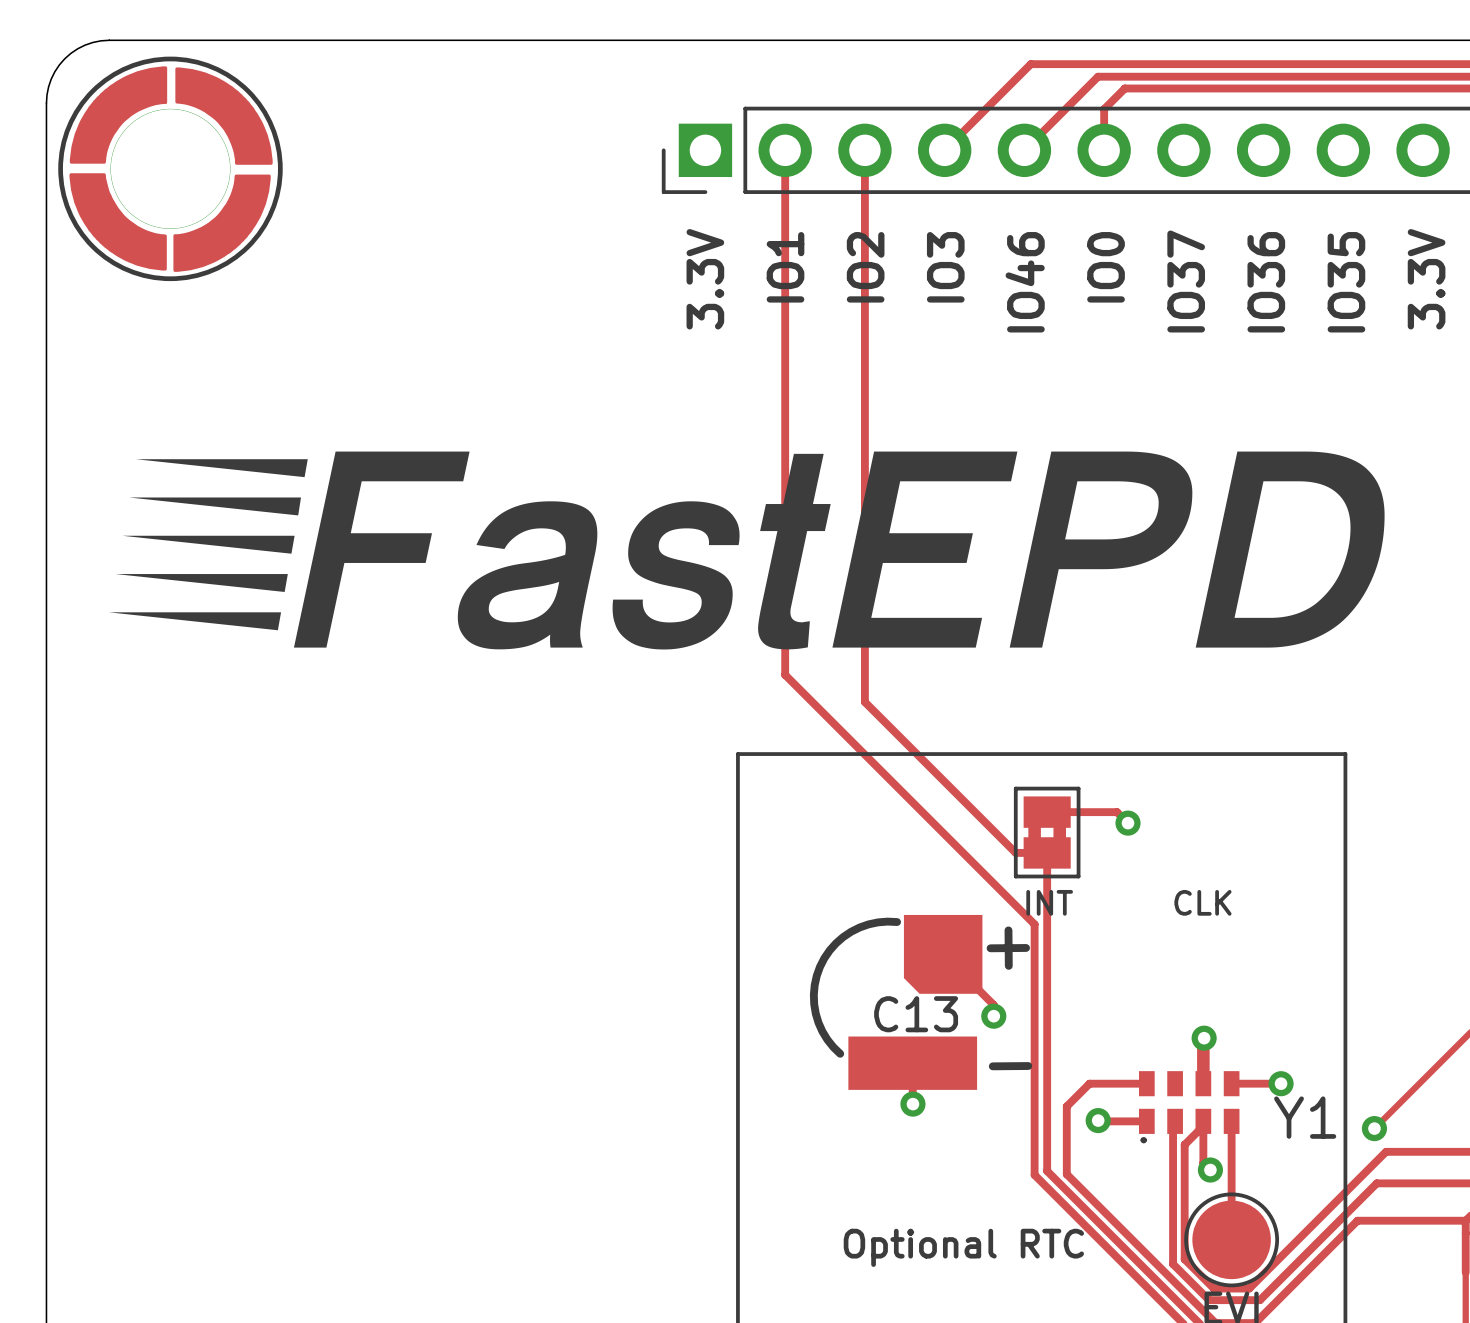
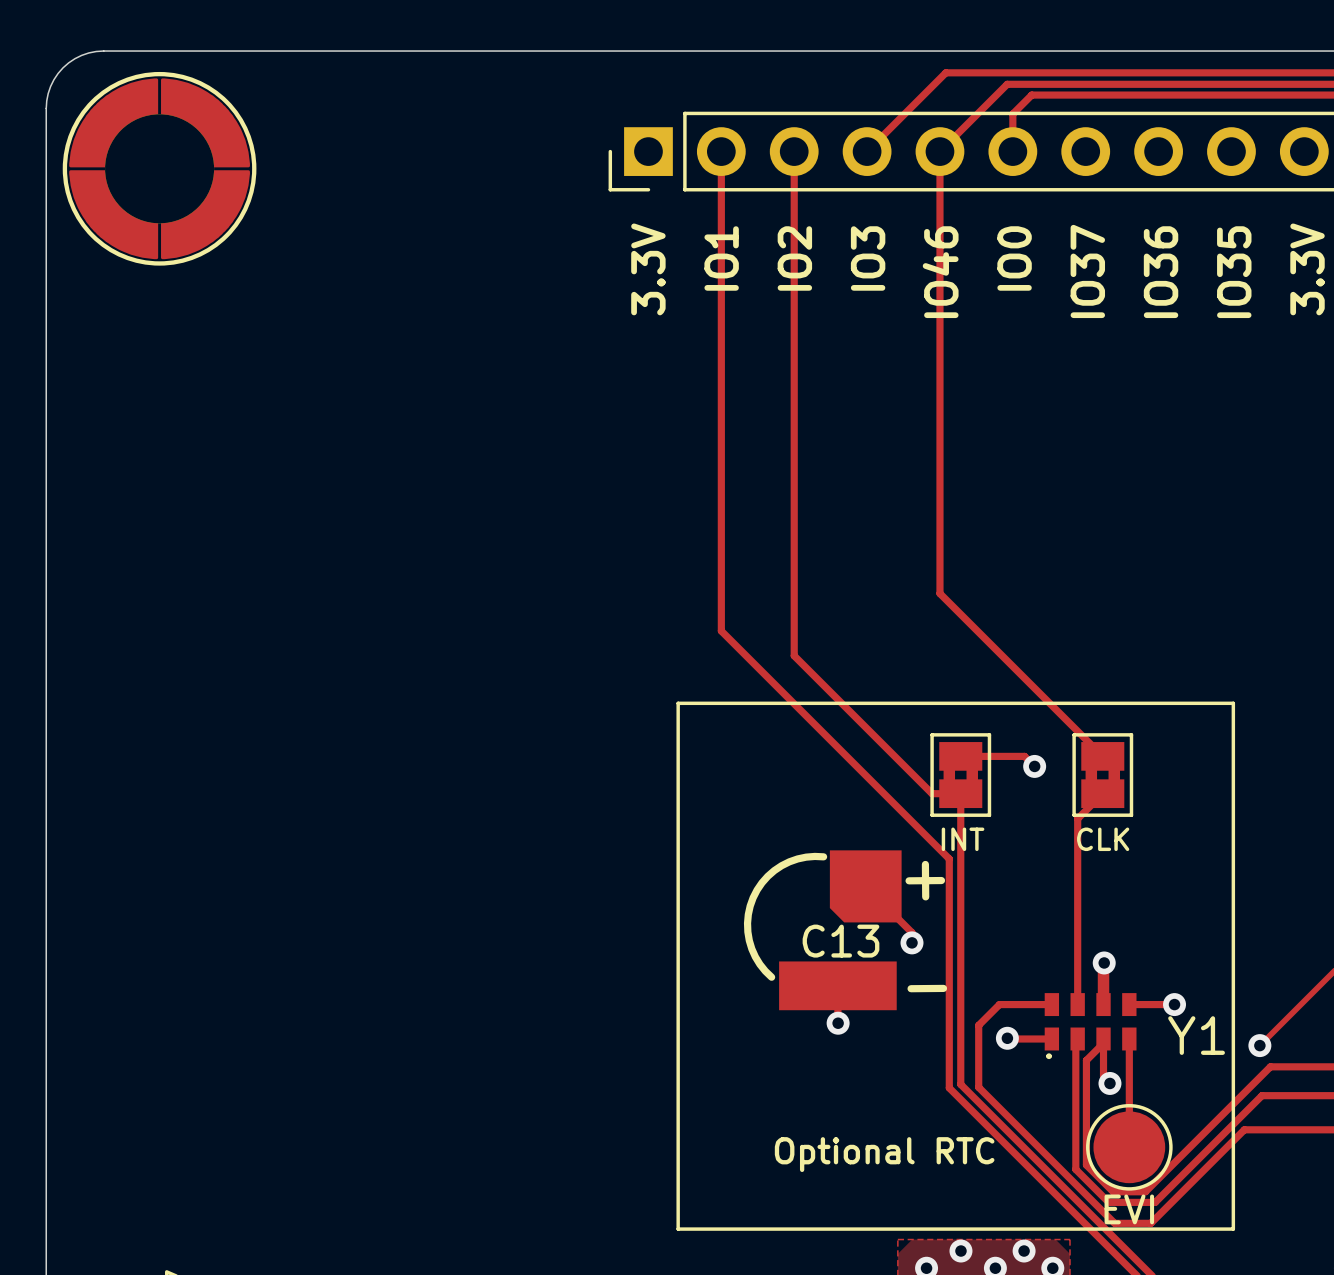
part footprint: [58, 56, 283, 282] -> [62, 71, 257, 266]
track: none -> (939, 151) (939, 593) (1102, 756)
drawing: [108, 451, 1385, 650] -> none
part: none -> (1102, 775)
track: none -> (1102, 793) (1077, 818) (1077, 1004)

